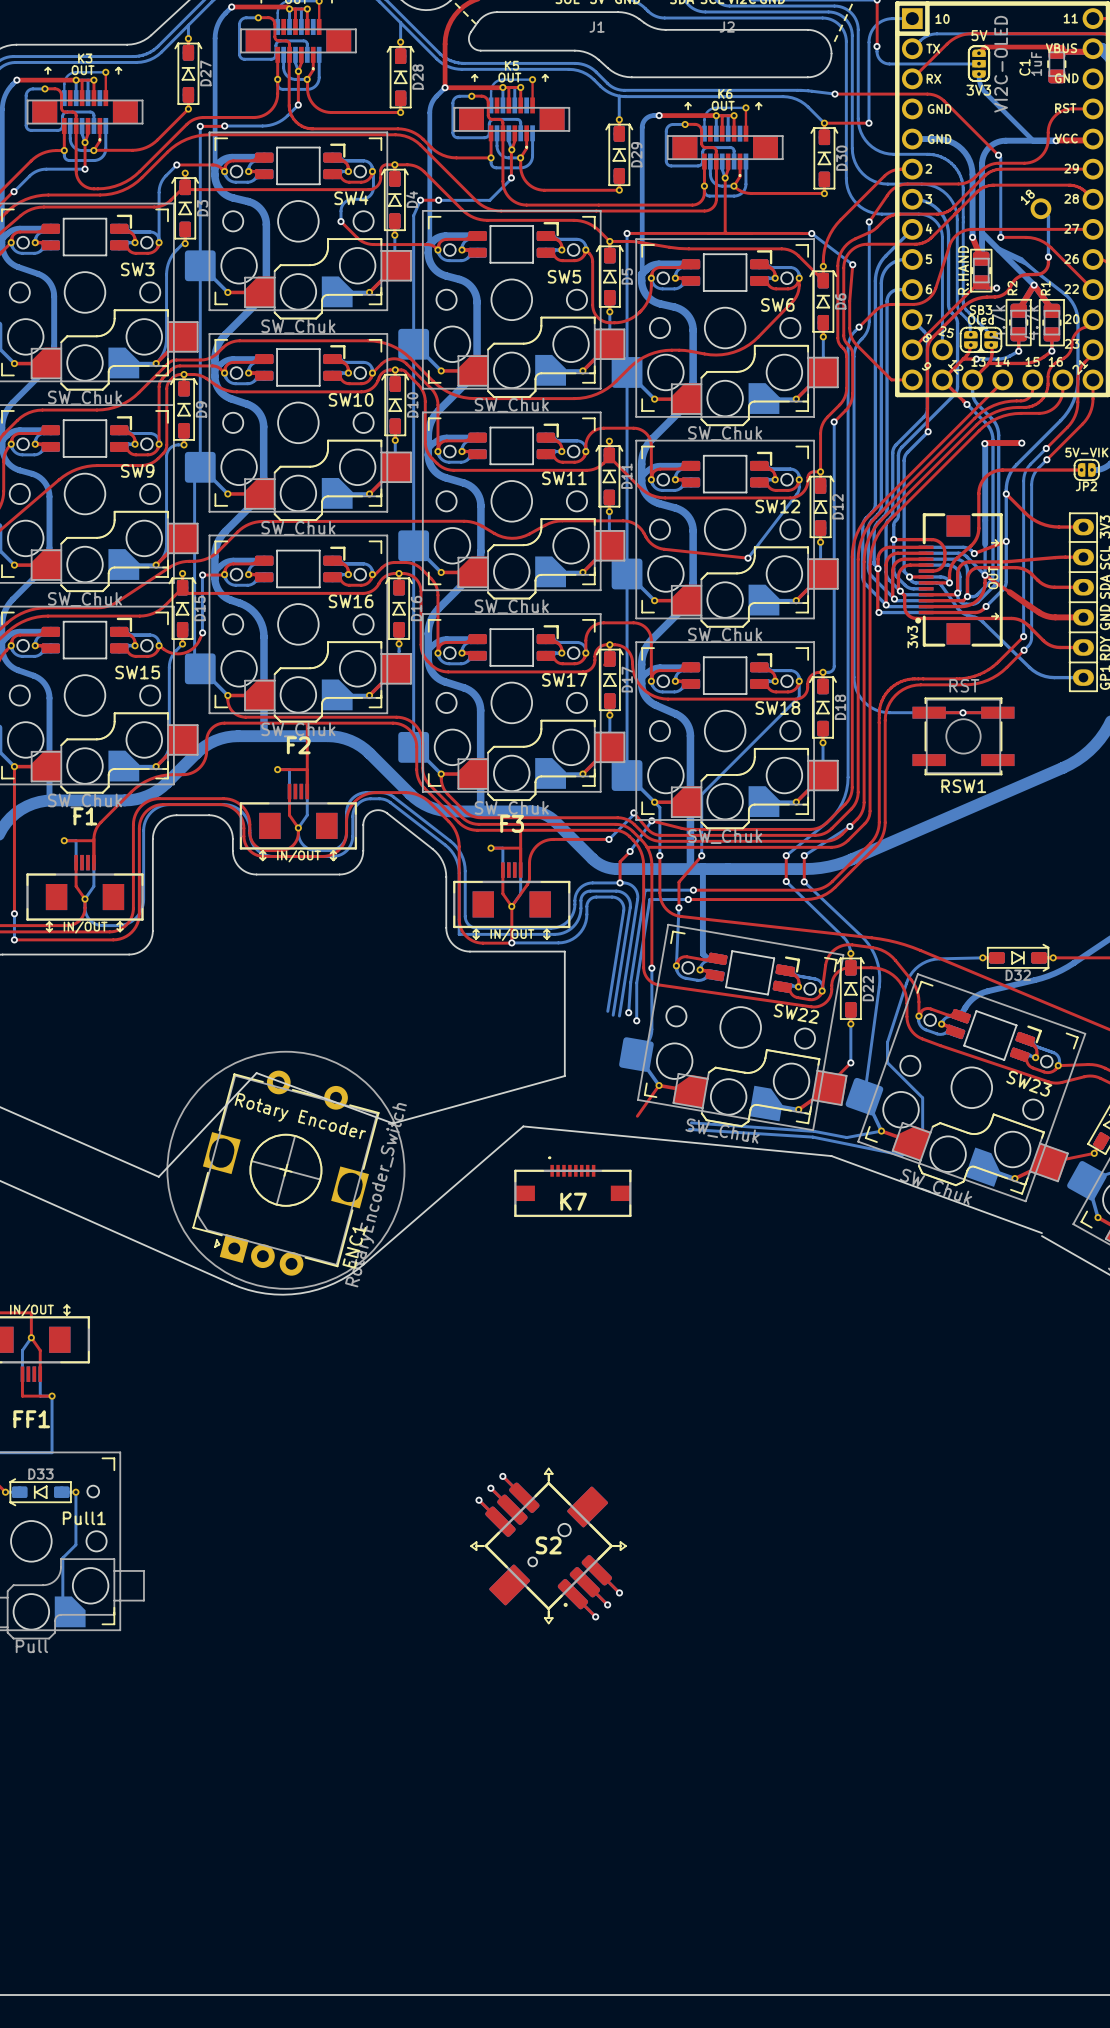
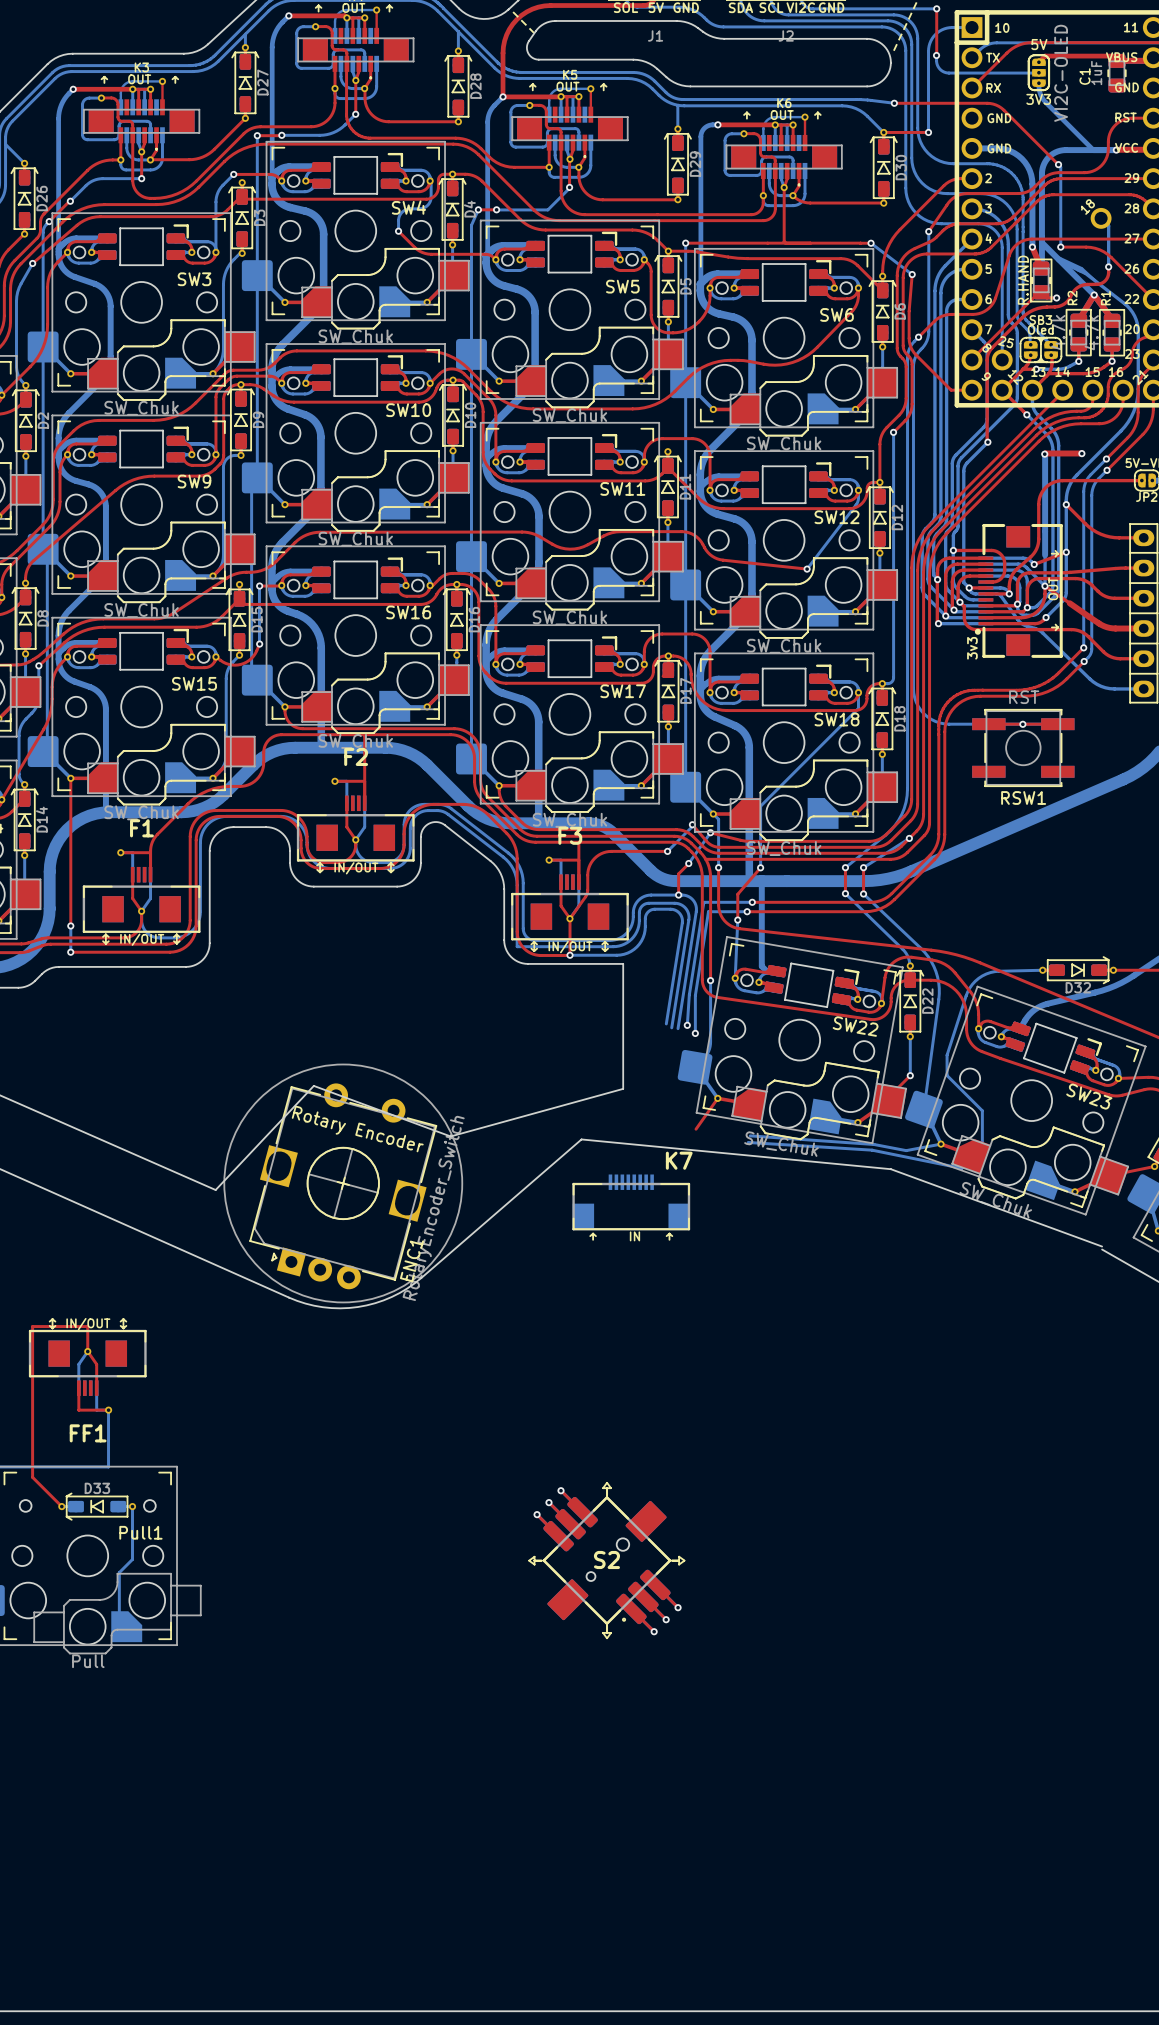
K7 footprint: [514, 1156, 632, 1218] -> [572, 1174, 691, 1241]
K7 name position: K7 (573, 1201) -> K7 (679, 1160)

